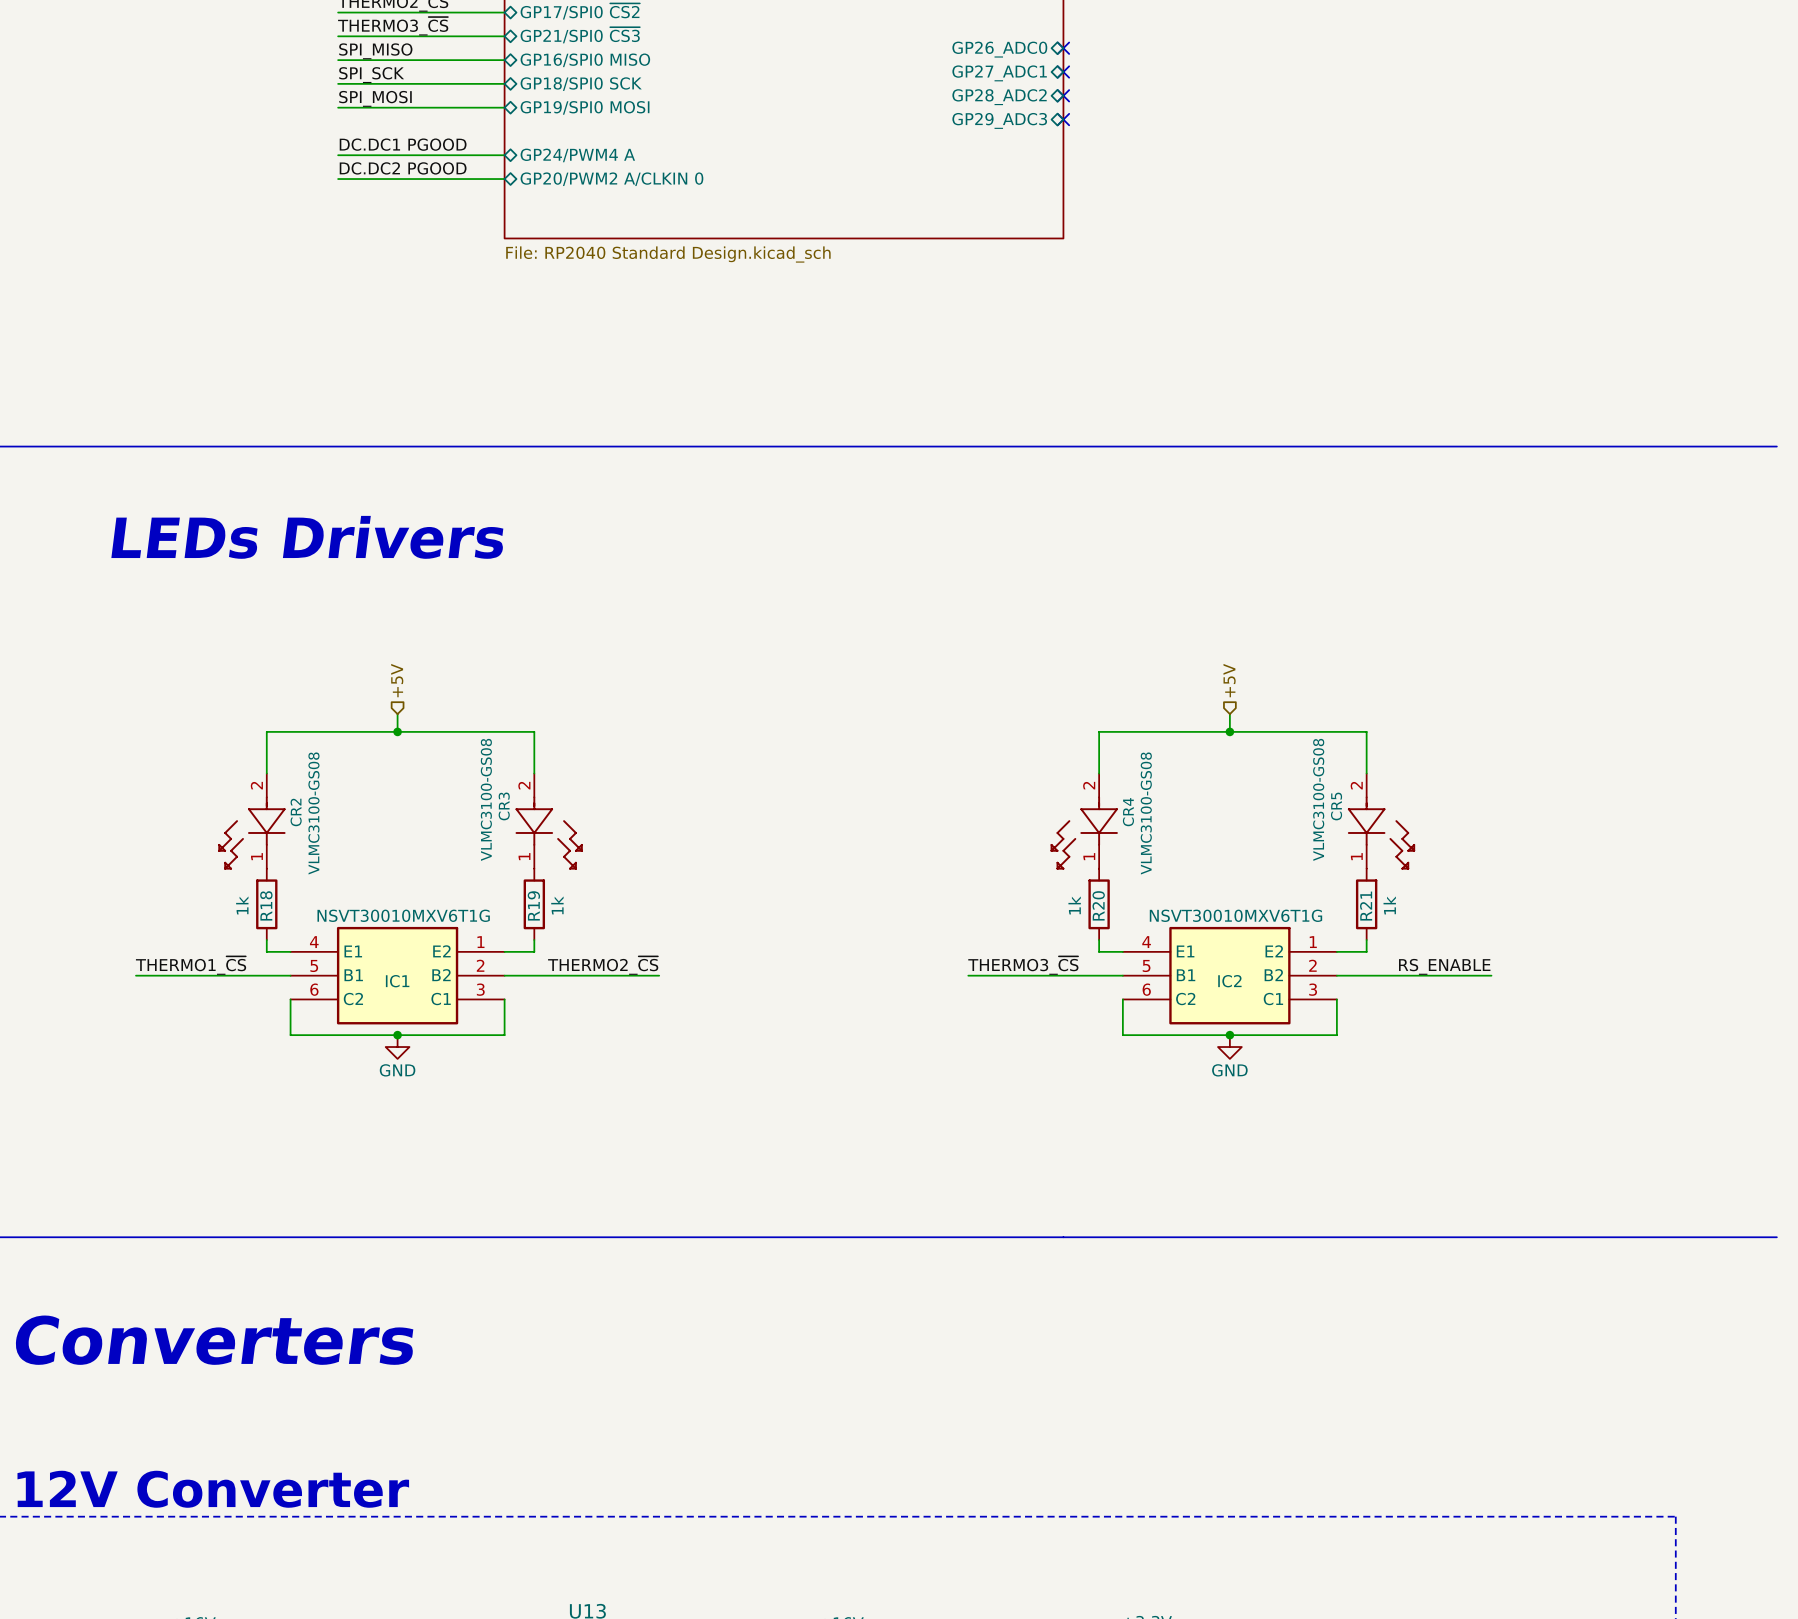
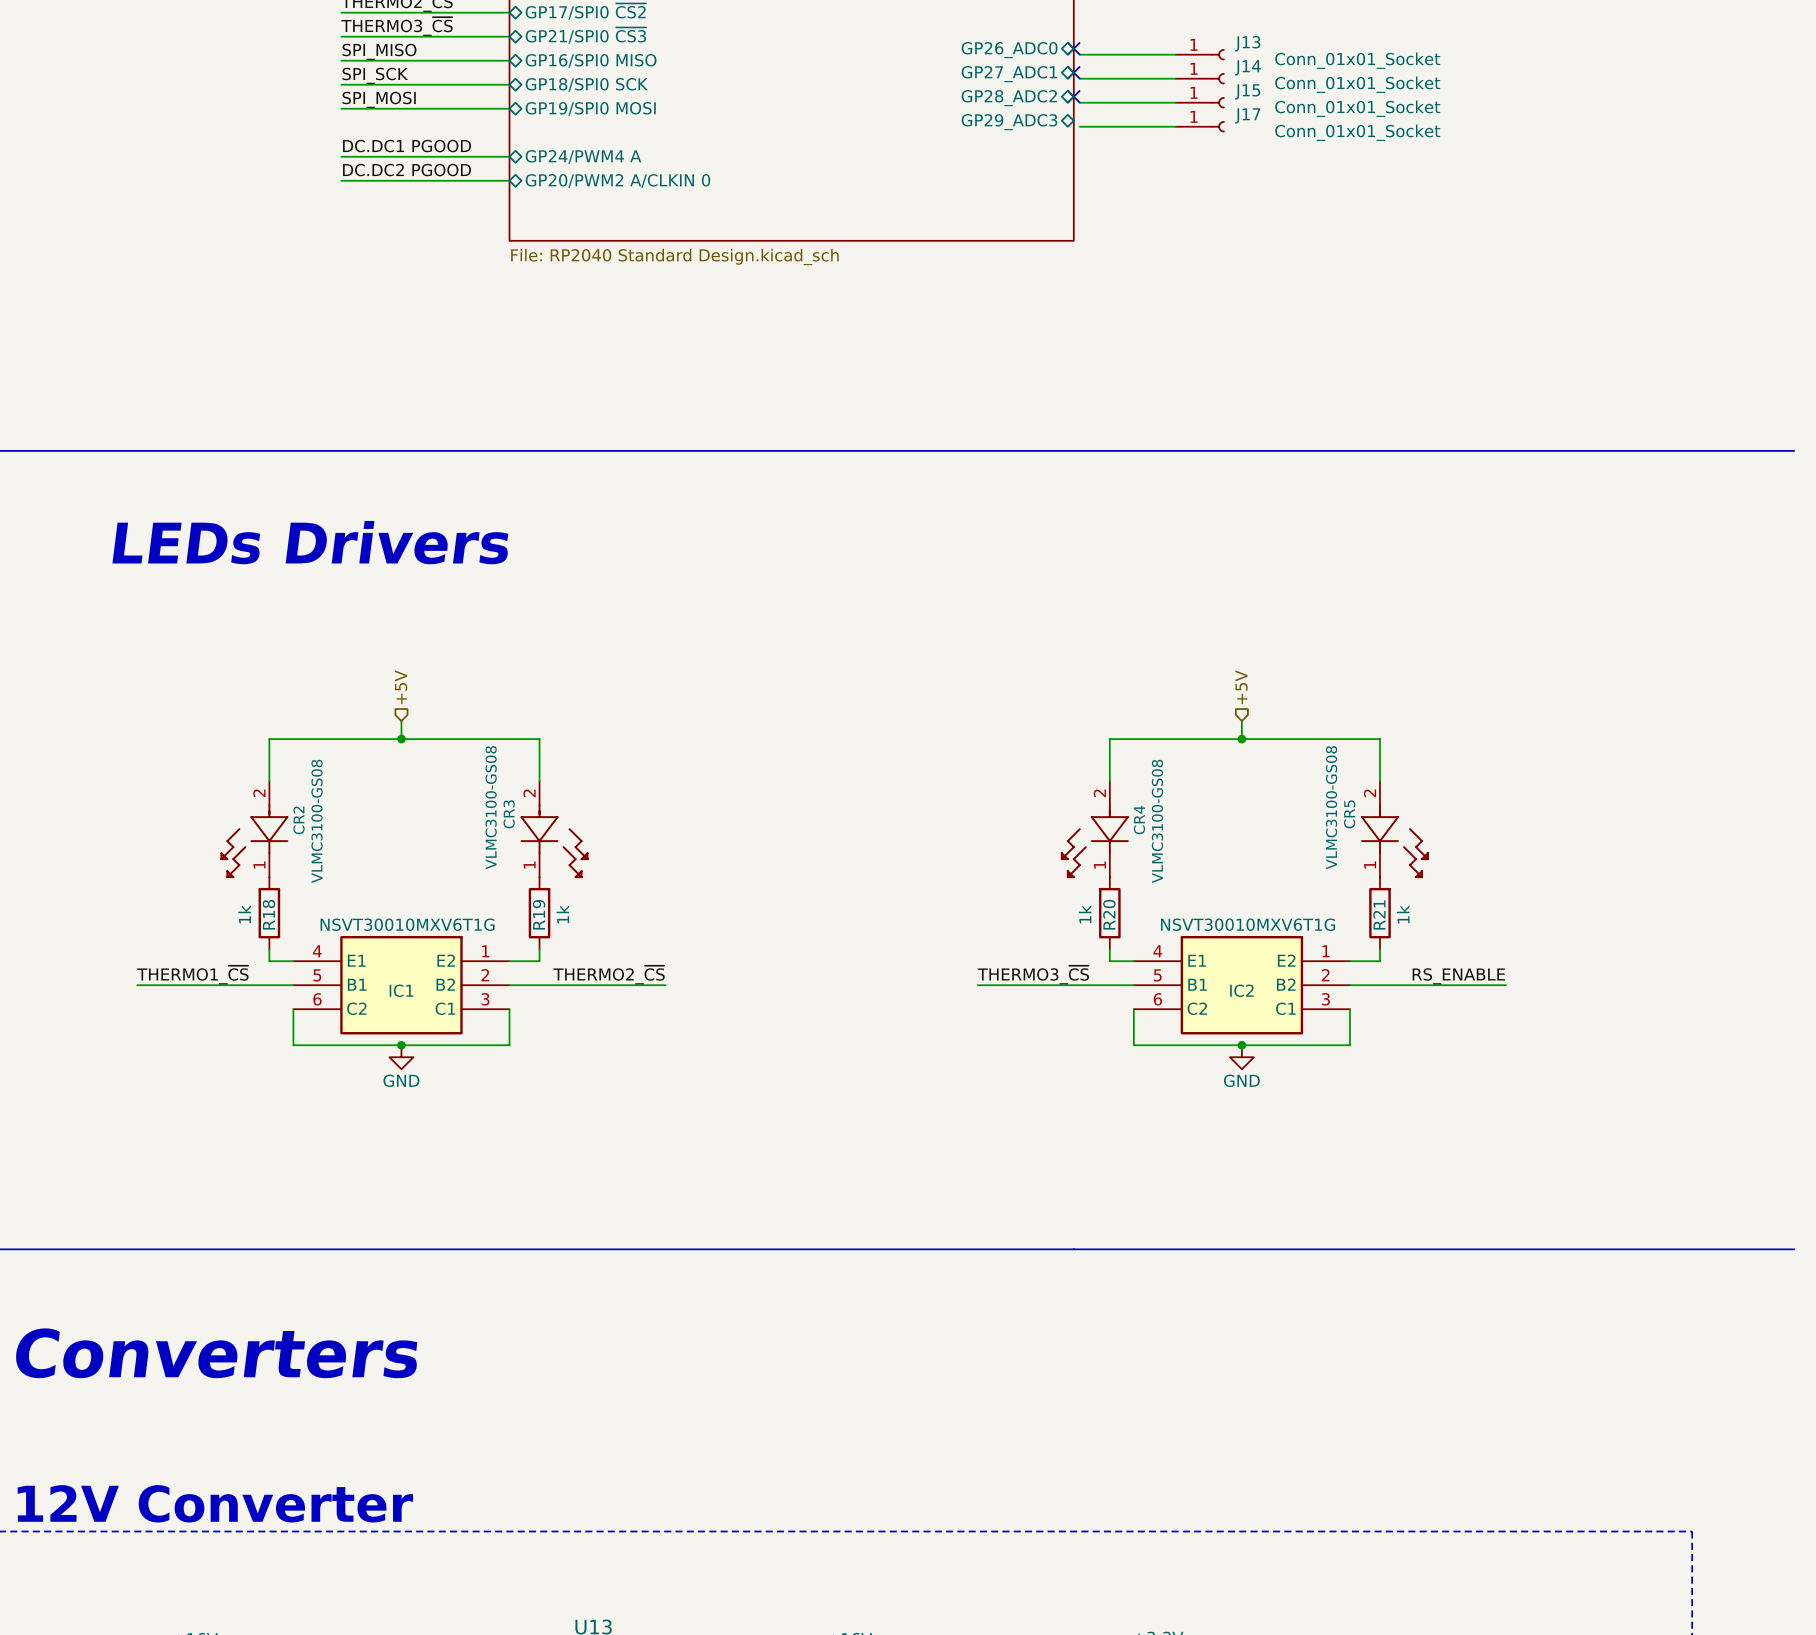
wire: none -> (1079, 54) (1175, 54)
J13: none -> Conn_01x01_Socket (1200, 54)
wire: none -> (1079, 78) (1175, 78)
J14: none -> Conn_01x01_Socket (1200, 78)
wire: none -> (1079, 102) (1175, 102)
J15: none -> Conn_01x01_Socket (1200, 102)
no-connect mark: (1063, 119) -> none
wire: none -> (1079, 126) (1175, 126)
J17: none -> Conn_01x01_Socket (1200, 126)

